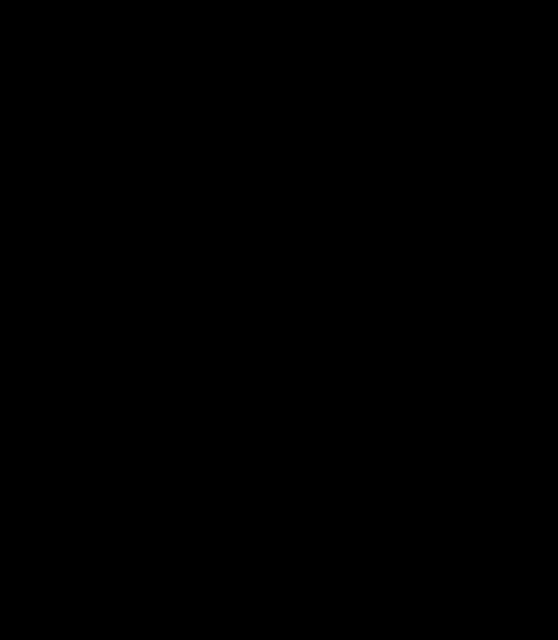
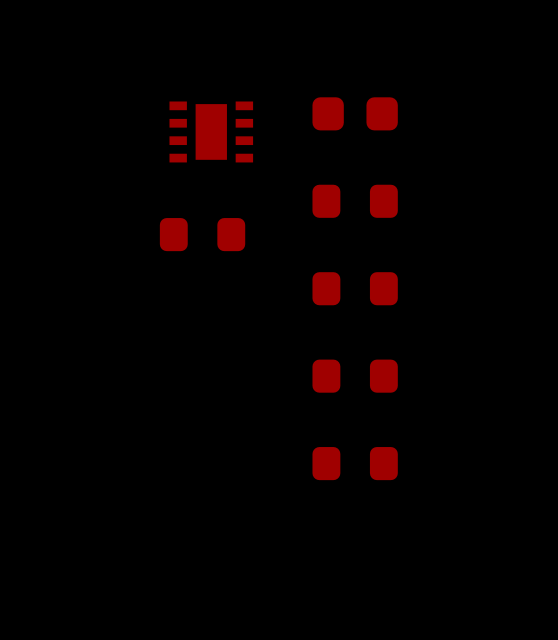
part: none -> (355, 113)
part: none -> (211, 131)
part: none -> (355, 201)
part: none -> (202, 234)
part: none -> (355, 288)
part: none -> (355, 376)
part: none -> (355, 463)

